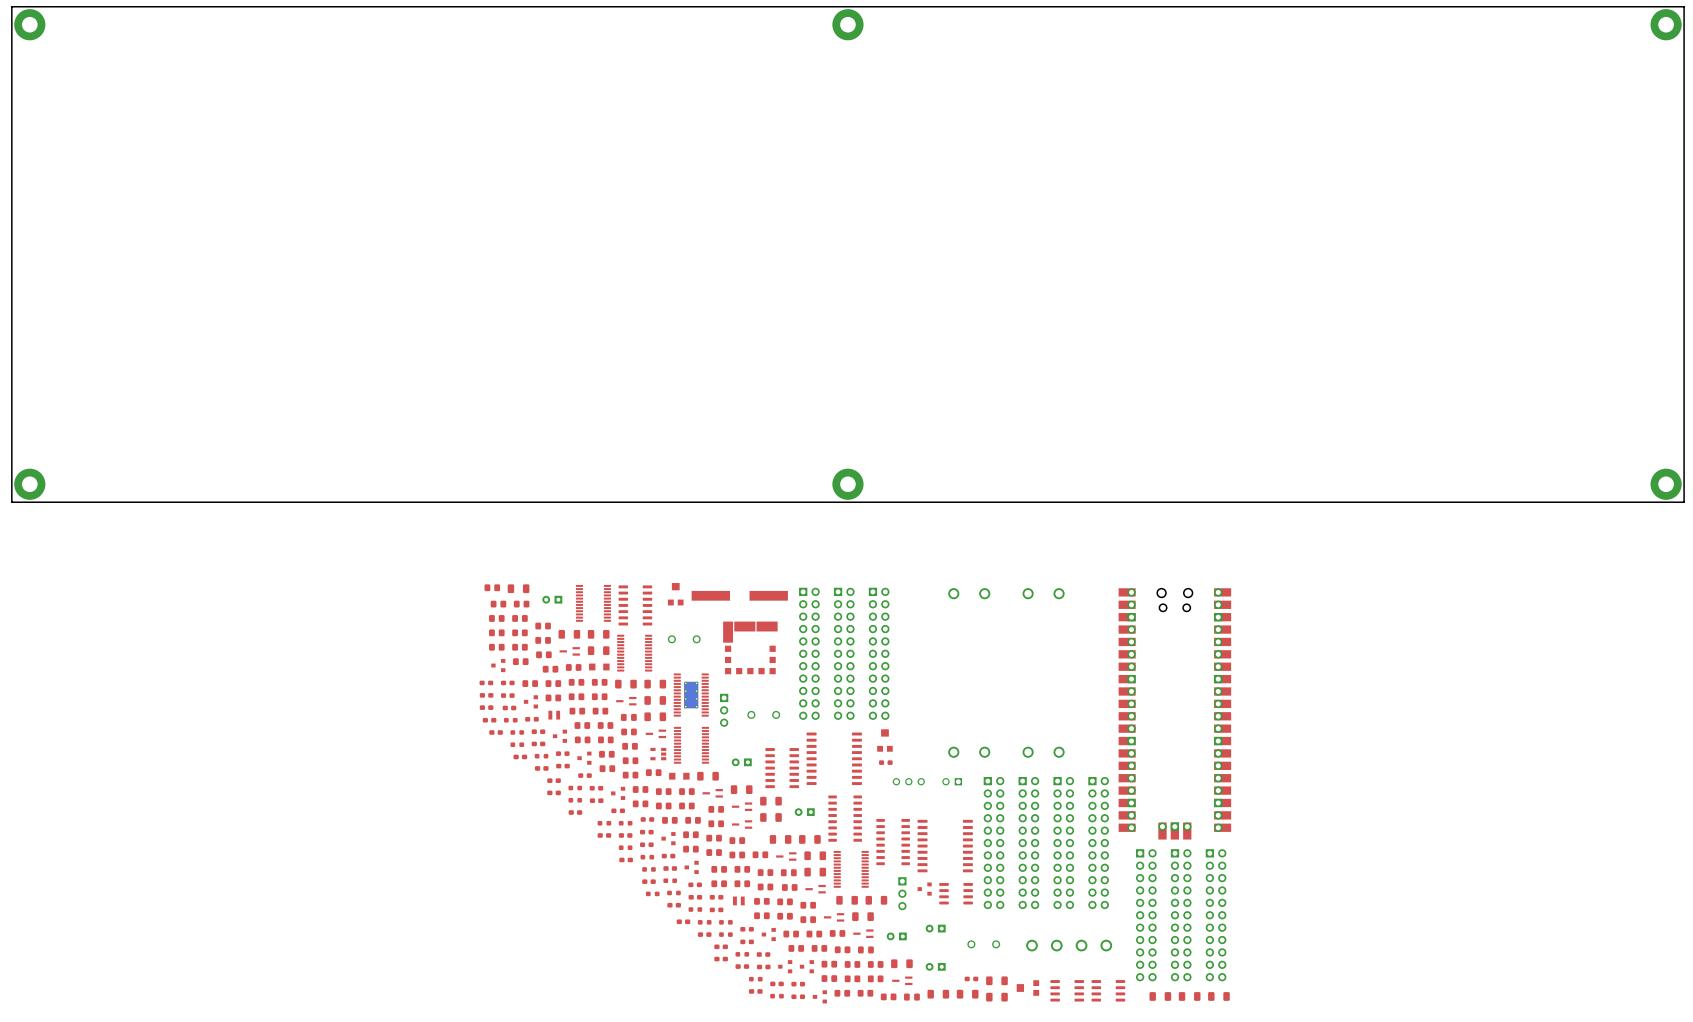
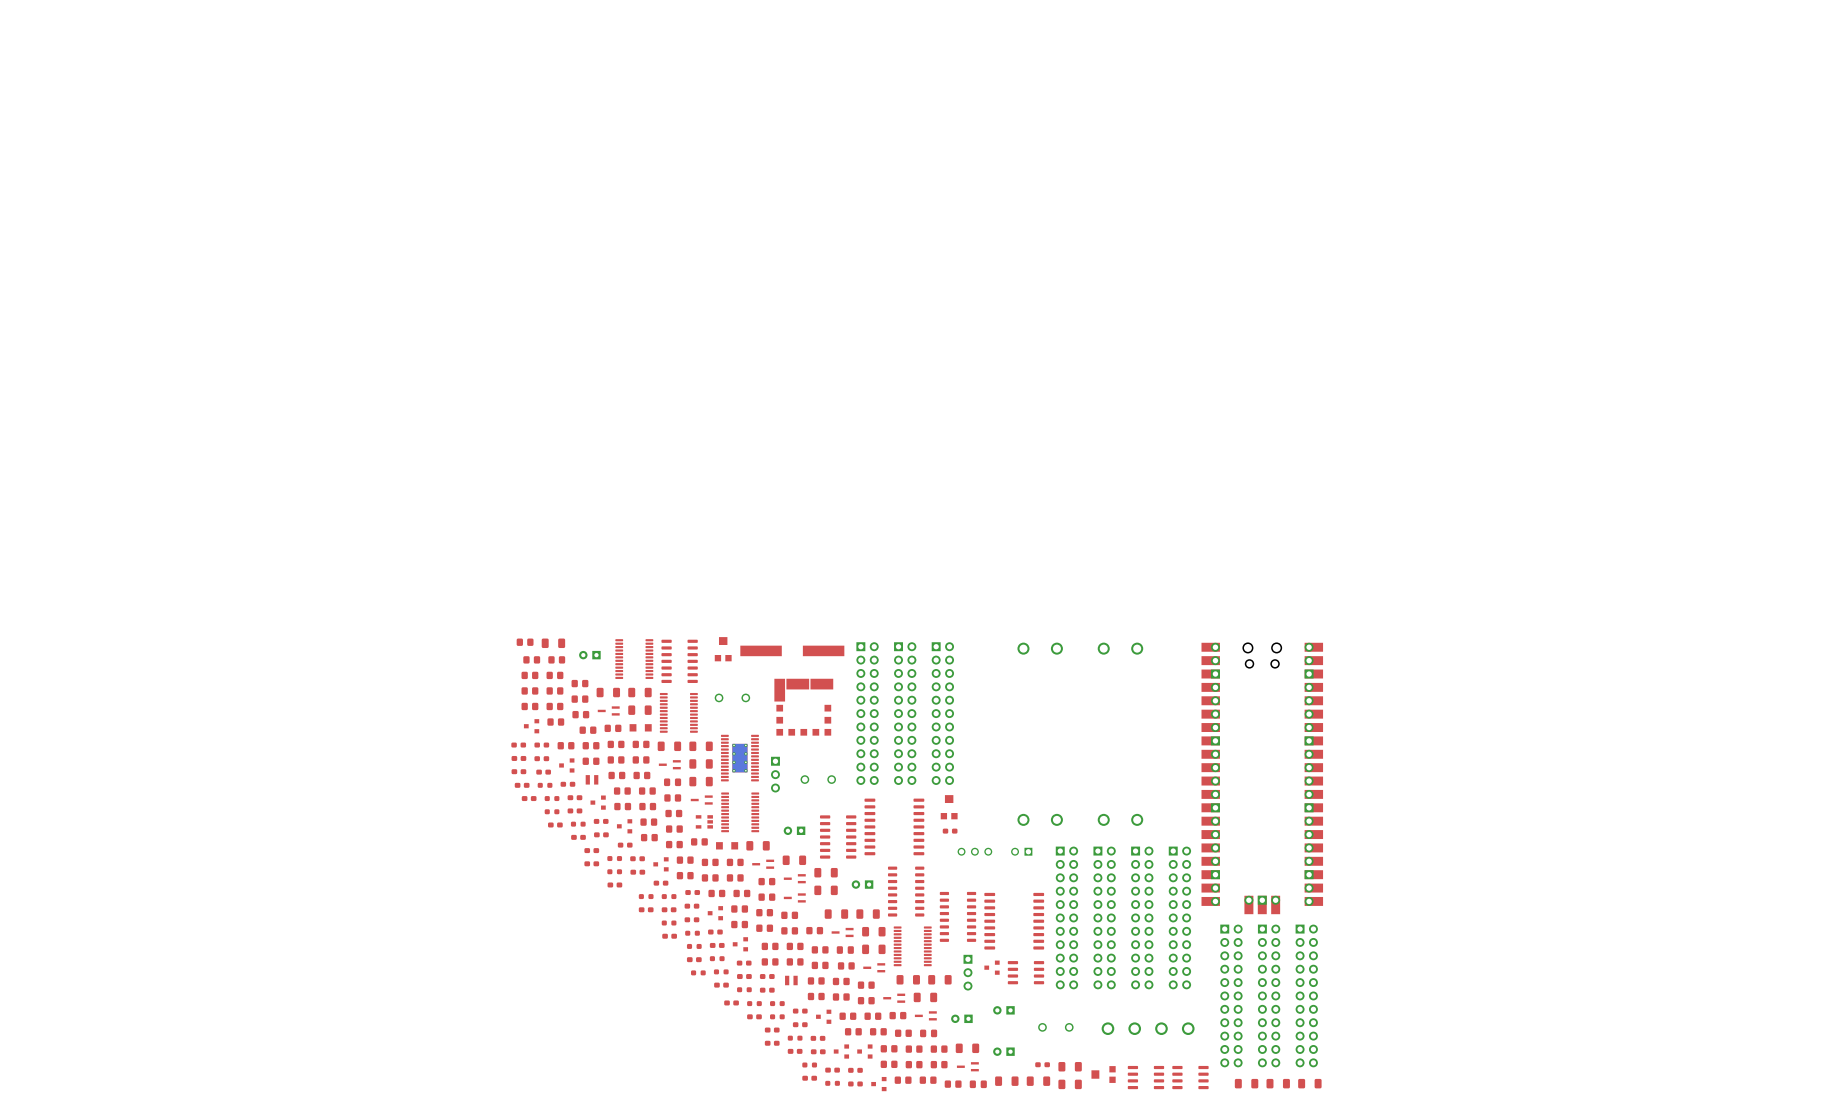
board edge: (1684, 6) (1684, 502) (11, 502) (11, 6) (1684, 6) -> none
part: (29, 24) -> none
part: (847, 24) -> none
part: (1666, 24) -> none
part: (29, 484) -> none
part: (847, 484) -> none
part: (1666, 484) -> none

